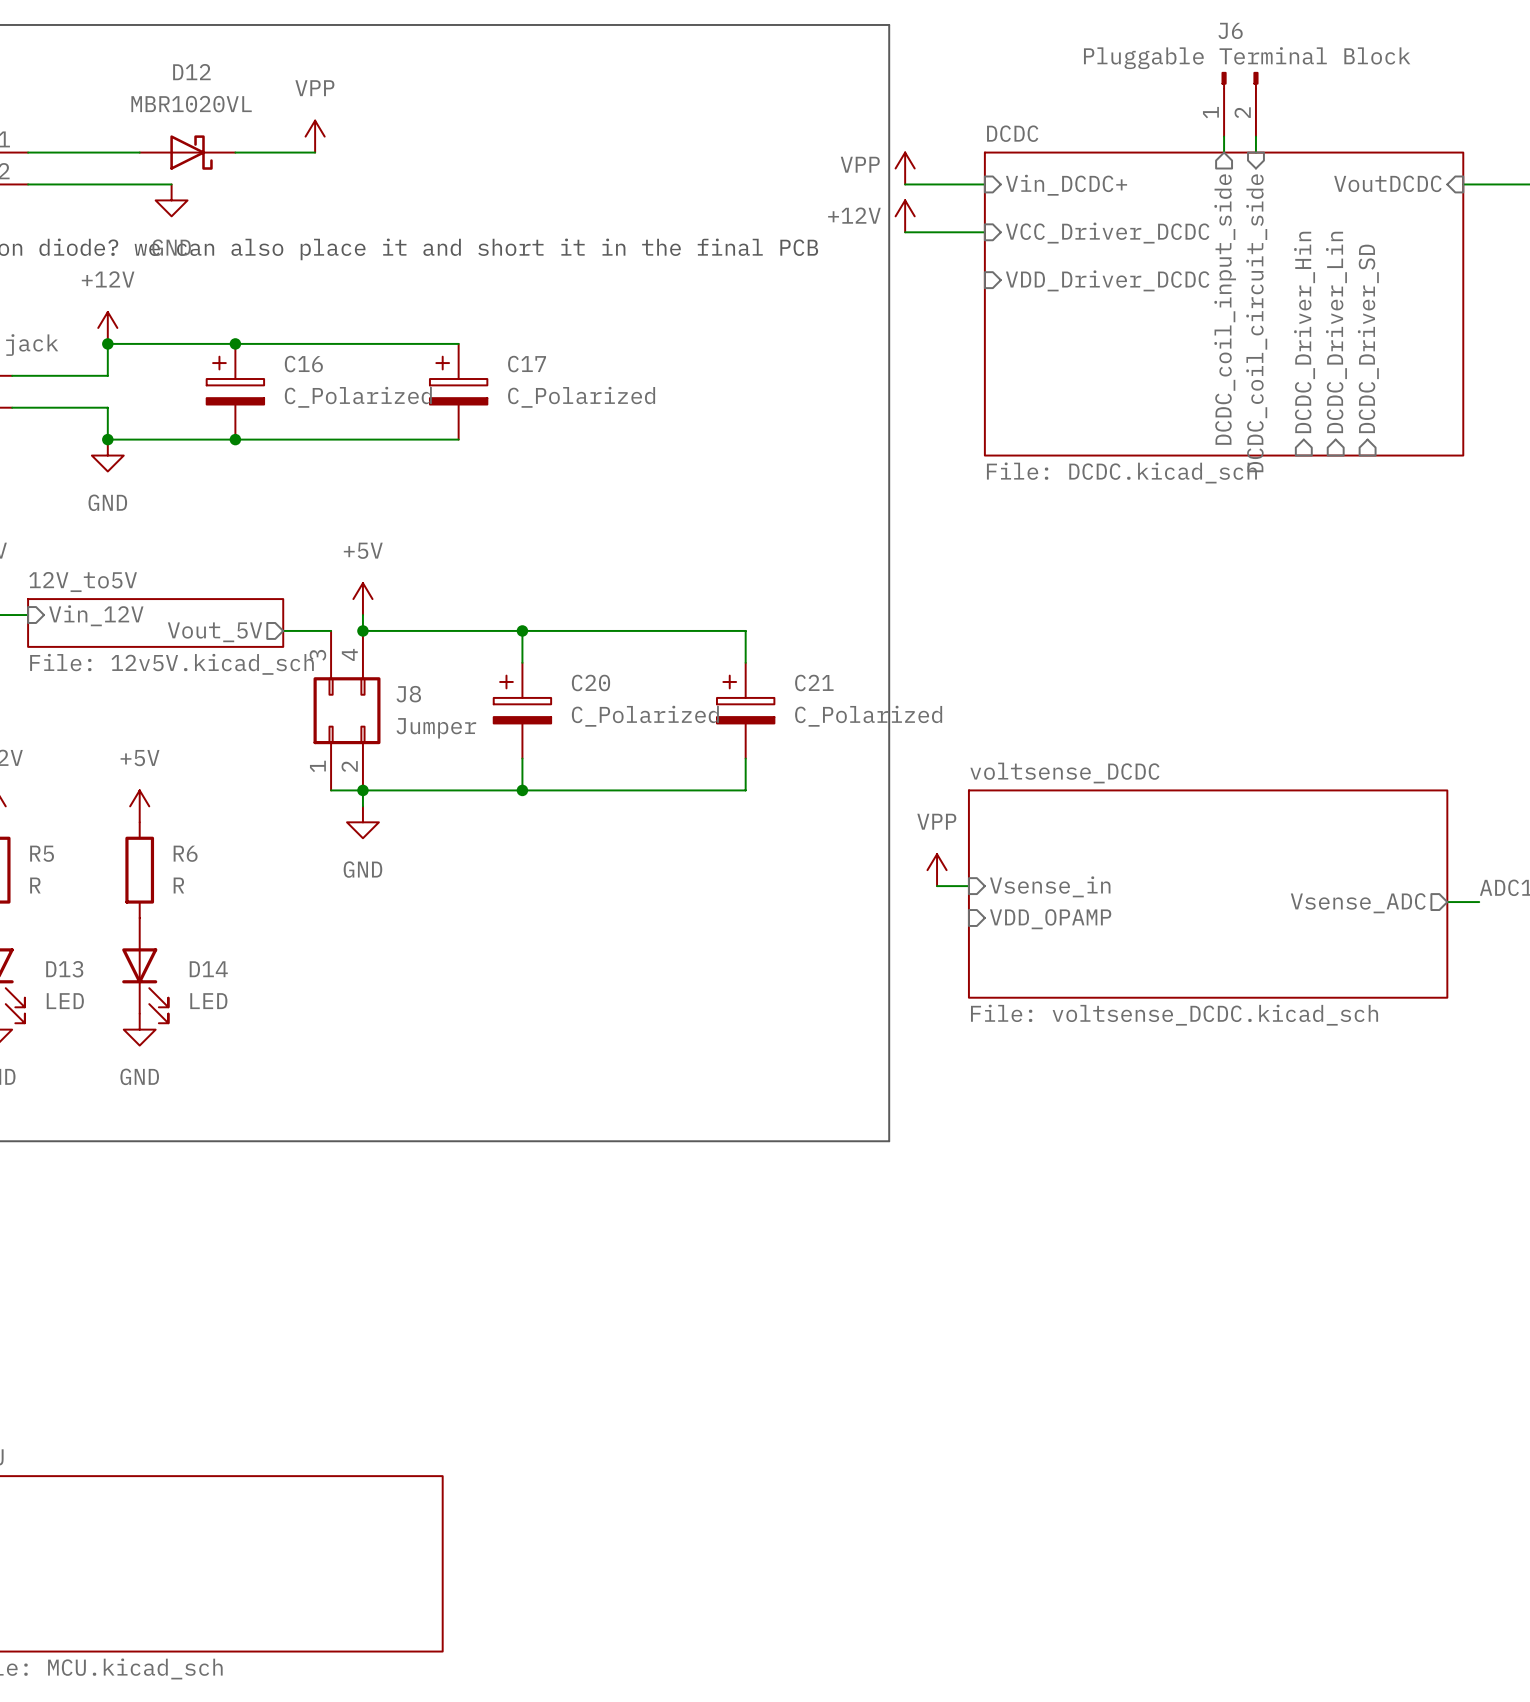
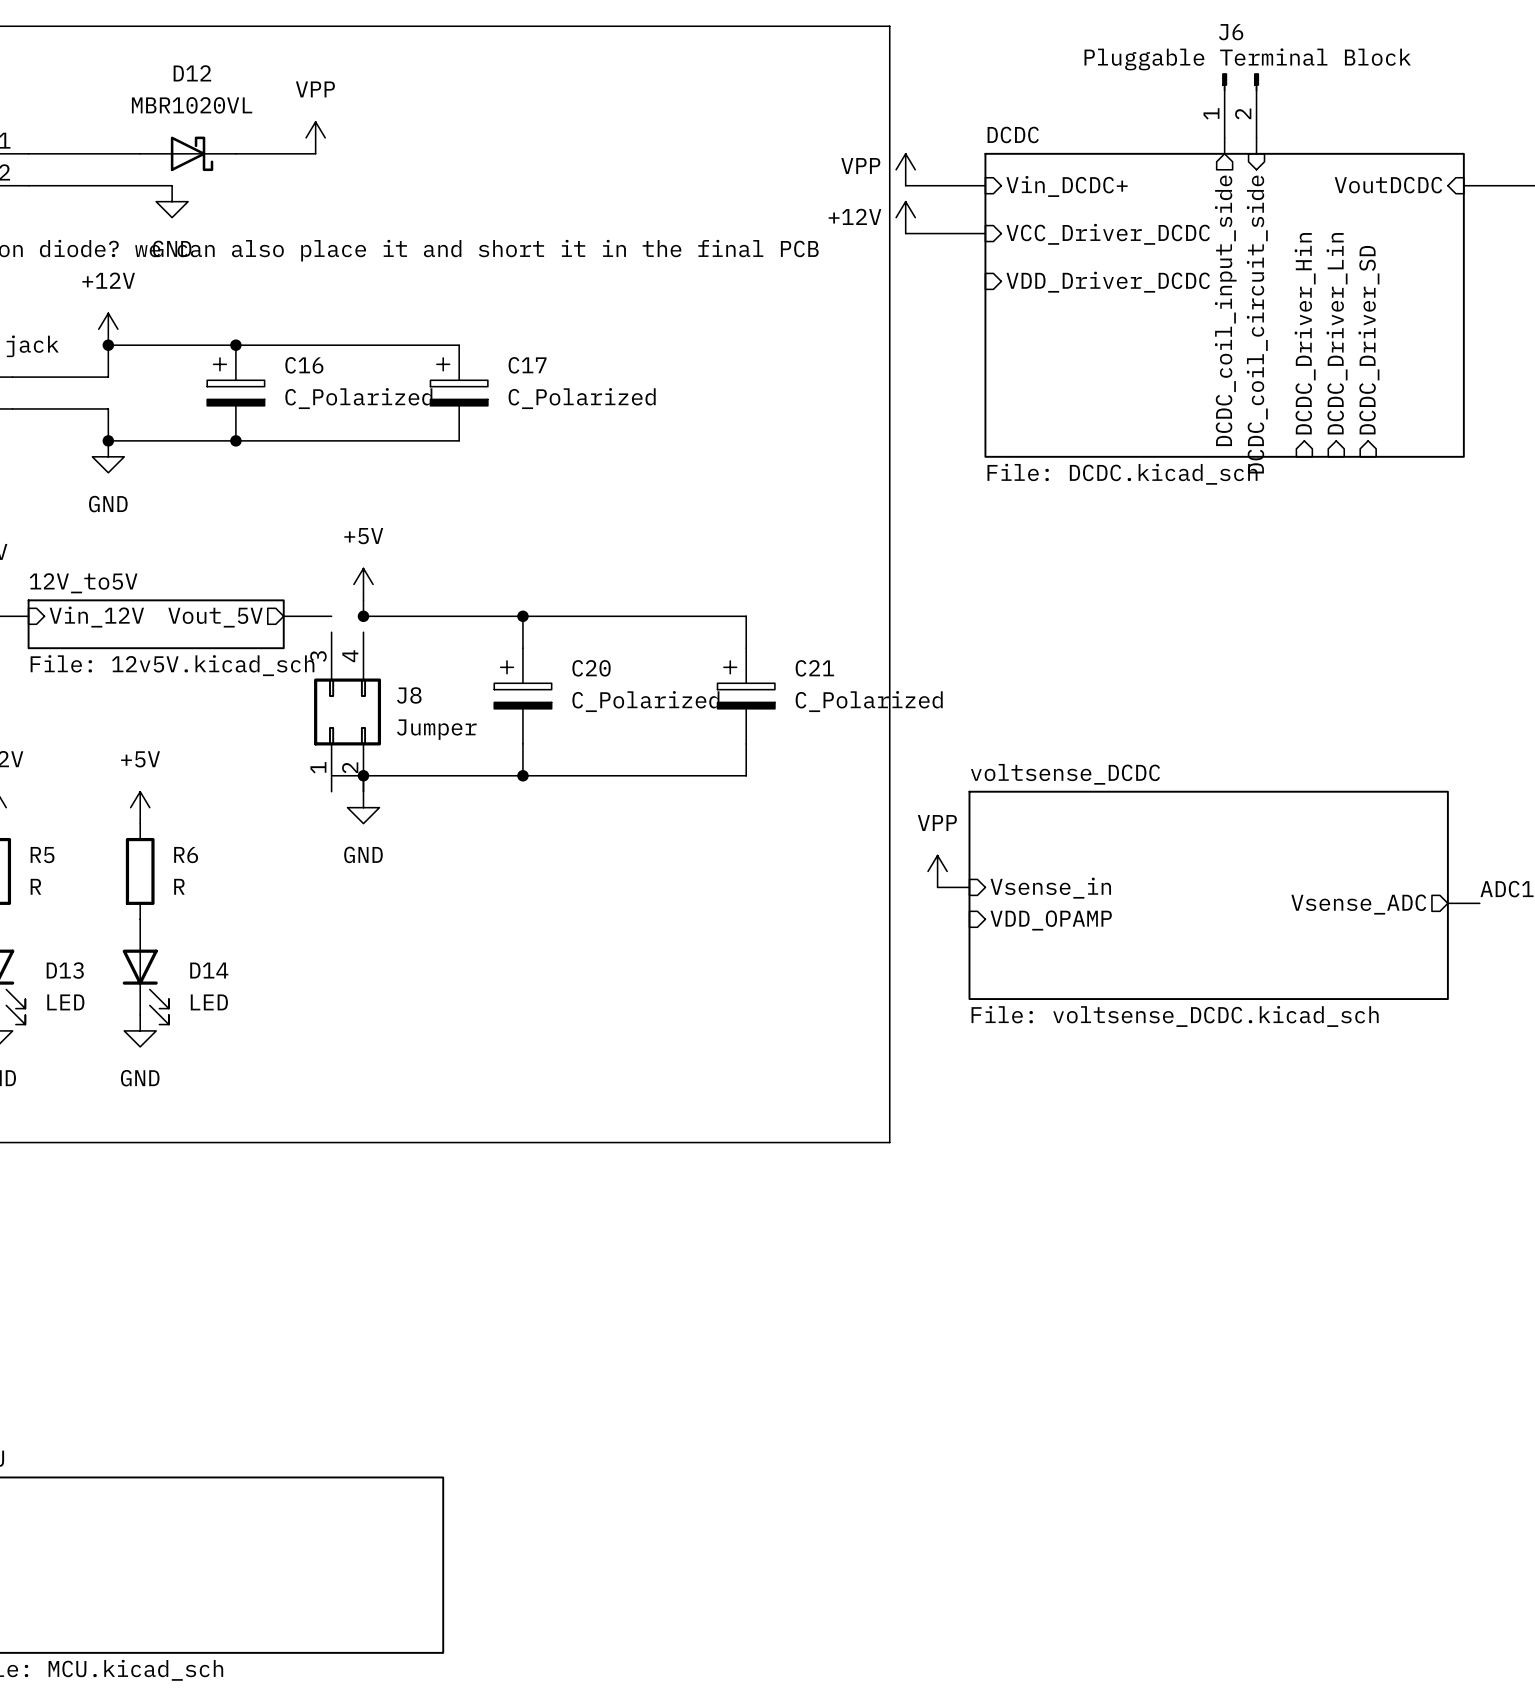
power symbol position: +5V (362, 599) -> +5V (363, 584)
wire: (362, 615) (362, 630) (745, 630) -> (363, 600) (363, 616) (746, 616) (746, 632)
wire: (283, 630) (331, 630) -> (283, 616) (331, 616)
junction position: (362, 630) -> (363, 616)
junction position: (522, 630) -> (522, 616)
sheet pin position: Vout_5V (215, 632) -> Vout_5V (215, 617)
C20 position: (522, 710) -> (522, 696)
C21 position: (745, 710) -> (746, 696)
wire: (745, 774) (745, 790) (331, 790) -> (746, 775) (331, 775)
junction position: (362, 790) -> (363, 775)
junction position: (522, 790) -> (522, 775)
power symbol position: GND (362, 822) -> GND (363, 807)

